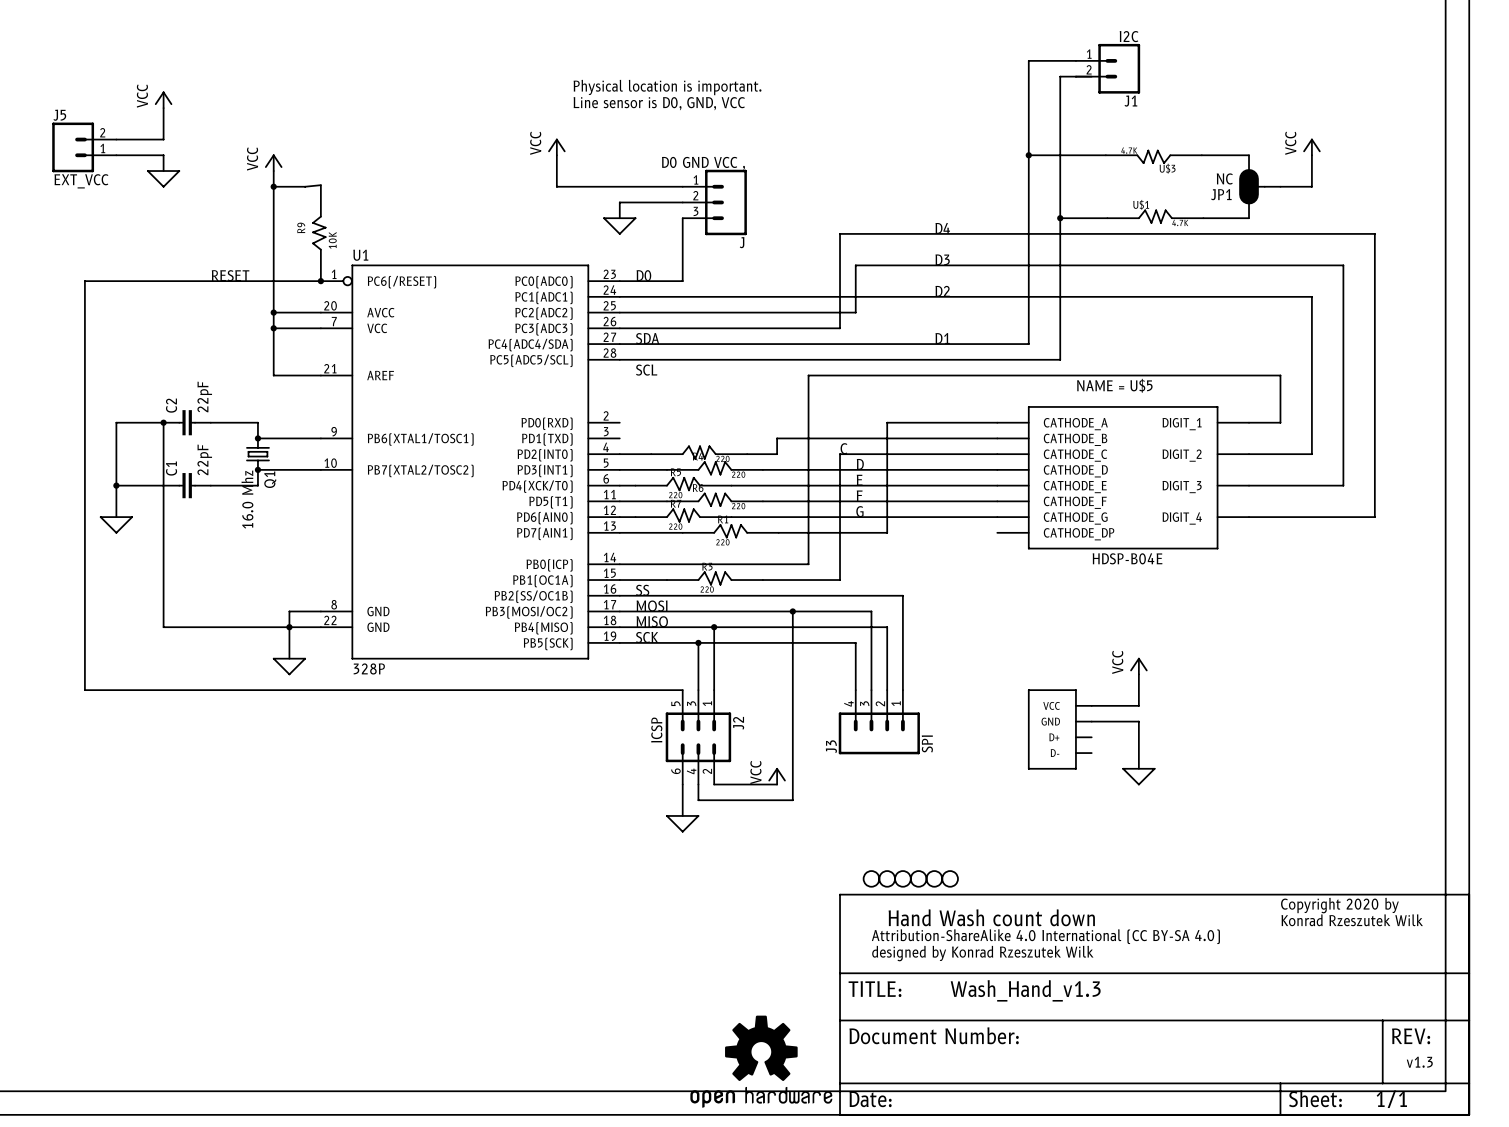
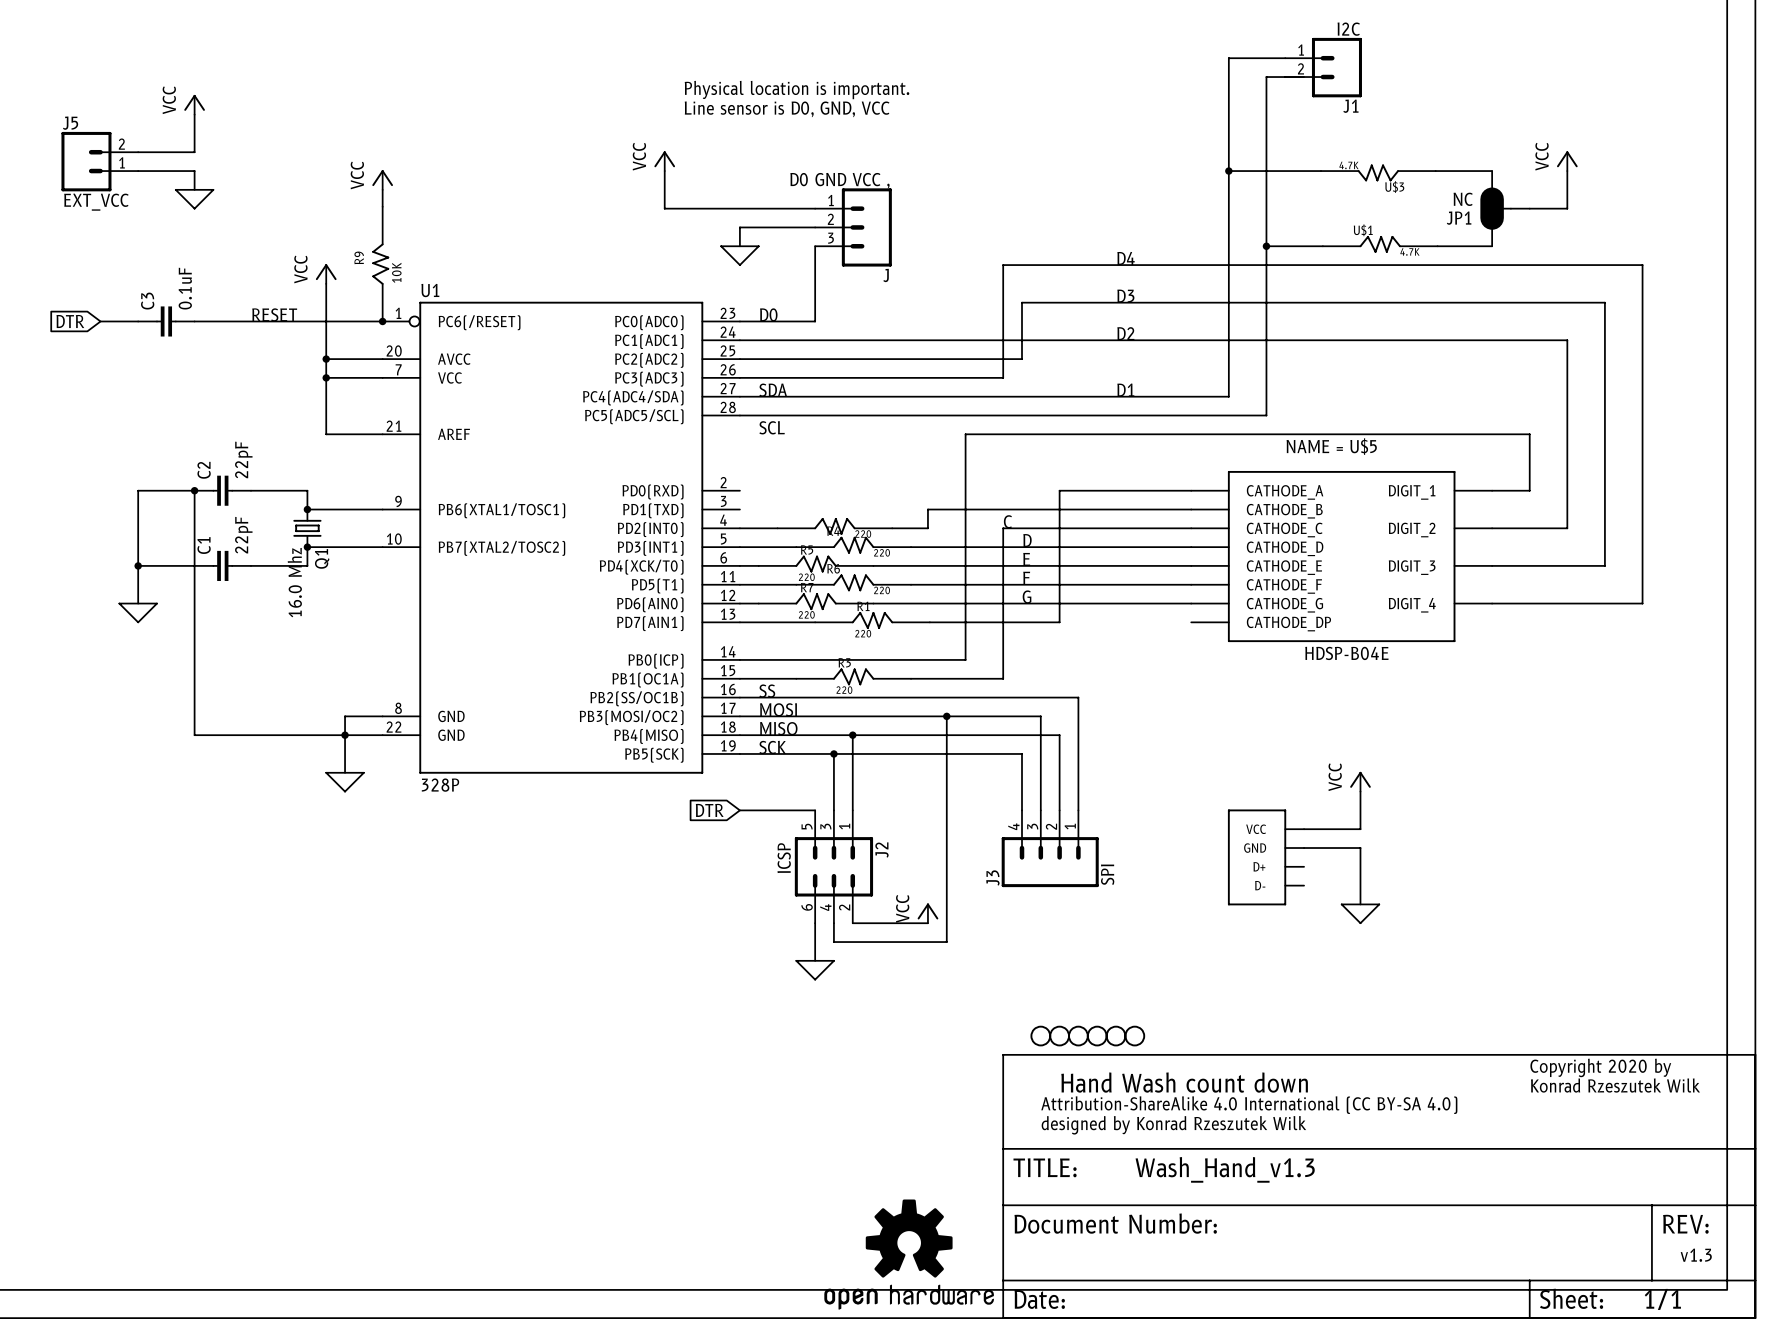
power symbol: VCC (273, 162) -> none
power symbol: none -> VCC (382, 179)
wire: (273, 171) (273, 249) -> none
wire: (320, 185) (273, 186) -> (382, 206) (382, 189)
junction: (273, 186) -> none
power symbol: none -> VCC (326, 273)
global label: none -> DTR (70, 321)
wire: (84, 281) (84, 690) (619, 690) -> none
C3: none -> 0.1uF (166, 321)
global label: none -> DTR (709, 810)

